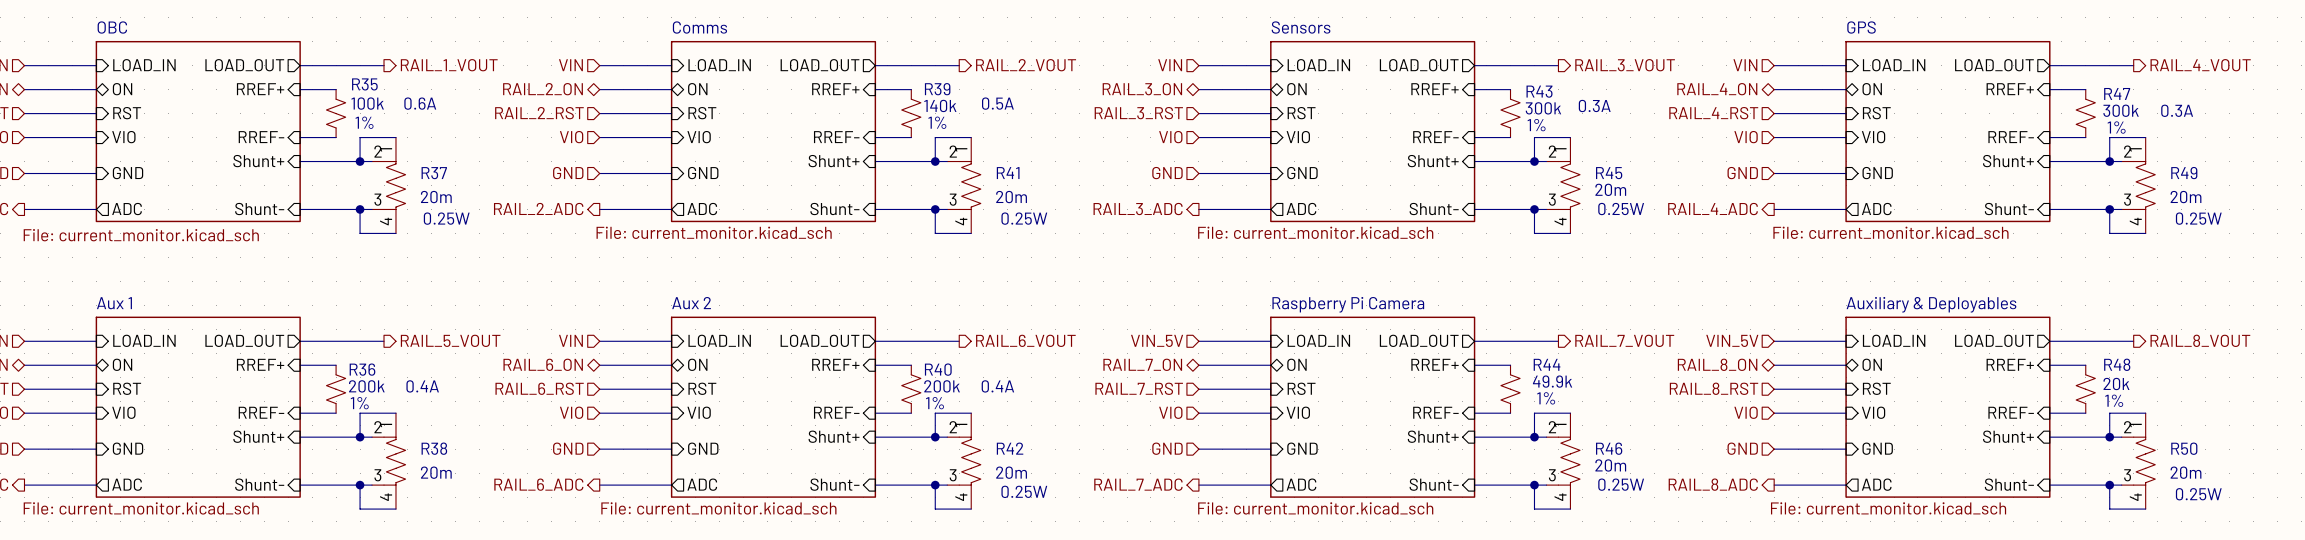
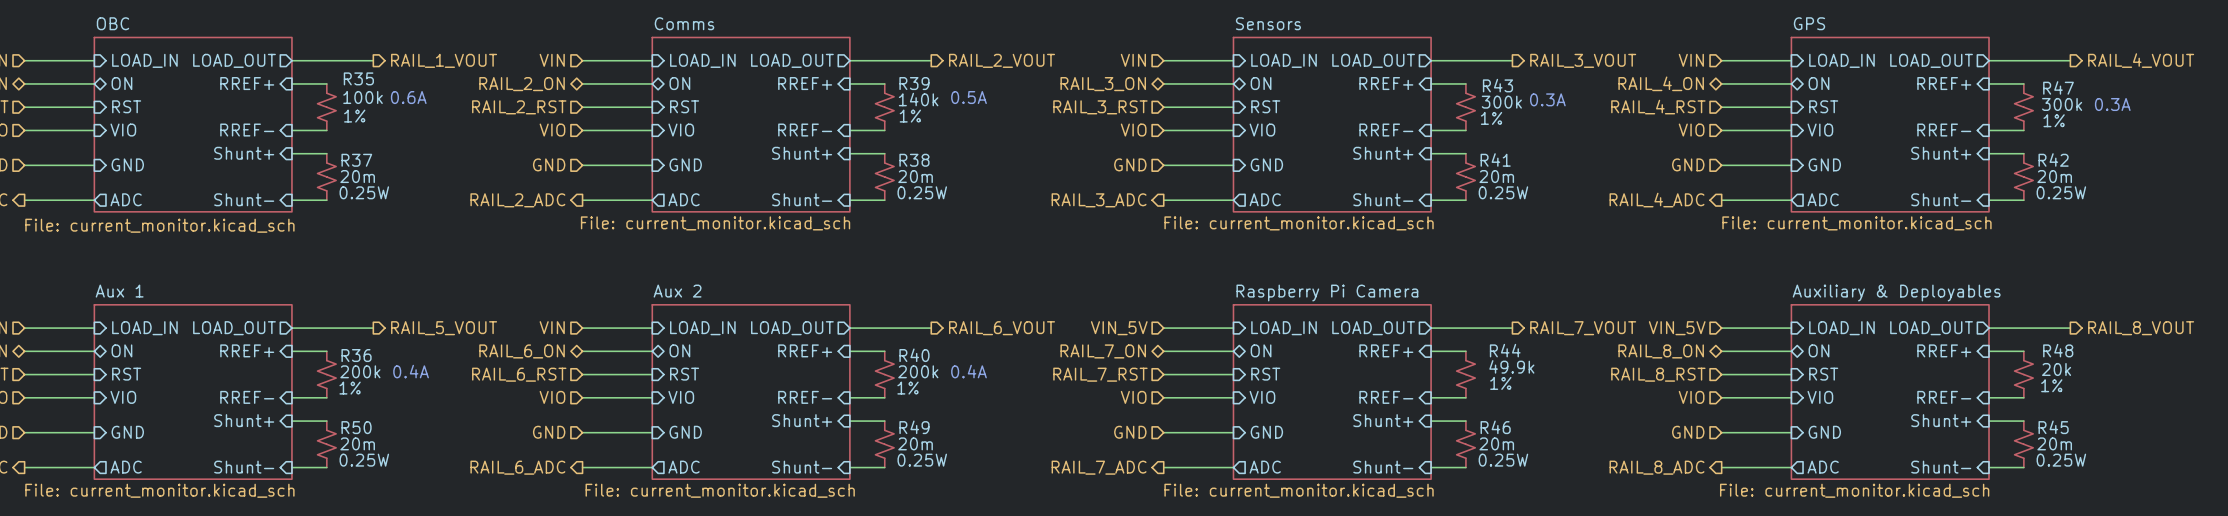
R37 symbol: [372, 137, 406, 234] -> [317, 153, 337, 201]
wire: (395, 137) (360, 137) (360, 161) -> none
R41 symbol: [947, 137, 981, 234] -> [1456, 153, 1476, 201]
wire: (971, 137) (935, 137) (935, 161) -> none
R45 symbol: [1546, 137, 1581, 234] -> [2014, 421, 2034, 468]
wire: (1570, 137) (1534, 137) (1534, 161) -> none
R49 symbol: [2121, 137, 2156, 234] -> [875, 421, 895, 468]
wire: (2145, 137) (2109, 137) (2109, 161) -> none
wire: (336, 161) (372, 161) -> none
junction: (360, 161) -> none
wire: (911, 161) (947, 161) -> none
junction: (935, 161) -> none
wire: (1510, 161) (1546, 161) -> none
junction: (1534, 161) -> none
wire: (2085, 161) (2121, 161) -> none
junction: (2109, 161) -> none
R37 name position: R37 (434, 173) -> R37 (356, 160)
R41 name position: R41 (1008, 173) -> R41 (1495, 159)
R45 name position: R45 (1609, 173) -> R45 (2053, 427)
R49 name position: R49 (2184, 173) -> R49 (914, 427)
R45 value position: 20m (1610, 189) -> 20m (2054, 443)
R37 value position: 20m (436, 197) -> 20m (357, 176)
R41 value position: 20m (1011, 197) -> 20m (1496, 176)
R49 value position: 20m (2186, 197) -> 20m (915, 443)
R37 text: none -> 0.25W (364, 192)
R38 text: none -> 0.25W (922, 192)
R41 text: none -> 0.25W (1503, 192)
R42 text: none -> 0.25W (2061, 192)
wire: (336, 209) (372, 209) -> none
wire: (360, 209) (360, 233) (395, 233) -> none
junction: (360, 209) -> none
wire: (911, 209) (947, 209) -> none
wire: (935, 209) (935, 233) (971, 233) -> none
junction: (935, 209) -> none
wire: (1510, 209) (1546, 209) -> none
wire: (1534, 209) (1534, 233) (1570, 233) -> none
junction: (1534, 209) -> none
R45 text: 0.25W (1621, 209) -> none
wire: (2085, 209) (2121, 209) -> none
wire: (2109, 209) (2109, 233) (2145, 233) -> none
junction: (2109, 209) -> none
R37 text: 0.25W (446, 218) -> none
R41 text: 0.25W (1024, 218) -> none
R49 text: 0.25W (2198, 218) -> none
R38 symbol: [372, 413, 406, 510] -> [875, 153, 895, 201]
wire: (395, 413) (360, 413) (360, 437) -> none
R42 symbol: [947, 413, 981, 510] -> [2014, 153, 2034, 201]
wire: (971, 413) (935, 413) (935, 437) -> none
R46 symbol: [1546, 413, 1581, 510] -> [1456, 421, 1476, 468]
wire: (1570, 413) (1534, 413) (1534, 437) -> none
R50 symbol: [2121, 413, 2156, 510] -> [317, 421, 337, 468]
wire: (2145, 413) (2109, 413) (2109, 437) -> none
wire: (336, 437) (372, 437) -> none
junction: (360, 437) -> none
wire: (911, 437) (947, 437) -> none
junction: (935, 437) -> none
wire: (1510, 437) (1546, 437) -> none
junction: (1534, 437) -> none
wire: (2085, 437) (2121, 437) -> none
junction: (2109, 437) -> none
R38 name position: R38 (434, 448) -> R38 (914, 160)
R42 name position: R42 (1010, 448) -> R42 (2053, 159)
R46 name position: R46 (1609, 448) -> R46 (1495, 427)
R50 name position: R50 (2184, 448) -> R50 (356, 427)
R46 value position: 20m (1610, 465) -> 20m (1496, 443)
R38 value position: 20m (436, 472) -> 20m (915, 176)
R42 value position: 20m (1011, 472) -> 20m (2054, 176)
R50 value position: 20m (2186, 472) -> 20m (357, 443)
R50 text: none -> 0.25W (364, 460)
R49 text: none -> 0.25W (922, 460)
R46 text: none -> 0.25W (1503, 460)
R45 text: none -> 0.25W (2061, 460)
R46 text: 0.25W (1621, 484) -> none
wire: (336, 485) (372, 485) -> none
wire: (360, 485) (360, 509) (395, 509) -> none
junction: (360, 485) -> none
wire: (911, 485) (947, 485) -> none
wire: (935, 485) (935, 509) (971, 509) -> none
junction: (935, 485) -> none
wire: (1510, 485) (1546, 485) -> none
wire: (1534, 485) (1534, 509) (1570, 509) -> none
junction: (1534, 485) -> none
wire: (2085, 485) (2121, 485) -> none
wire: (2109, 485) (2109, 509) (2145, 509) -> none
junction: (2109, 485) -> none
R42 text: 0.25W (1024, 491) -> none
R50 text: 0.25W (2198, 494) -> none

